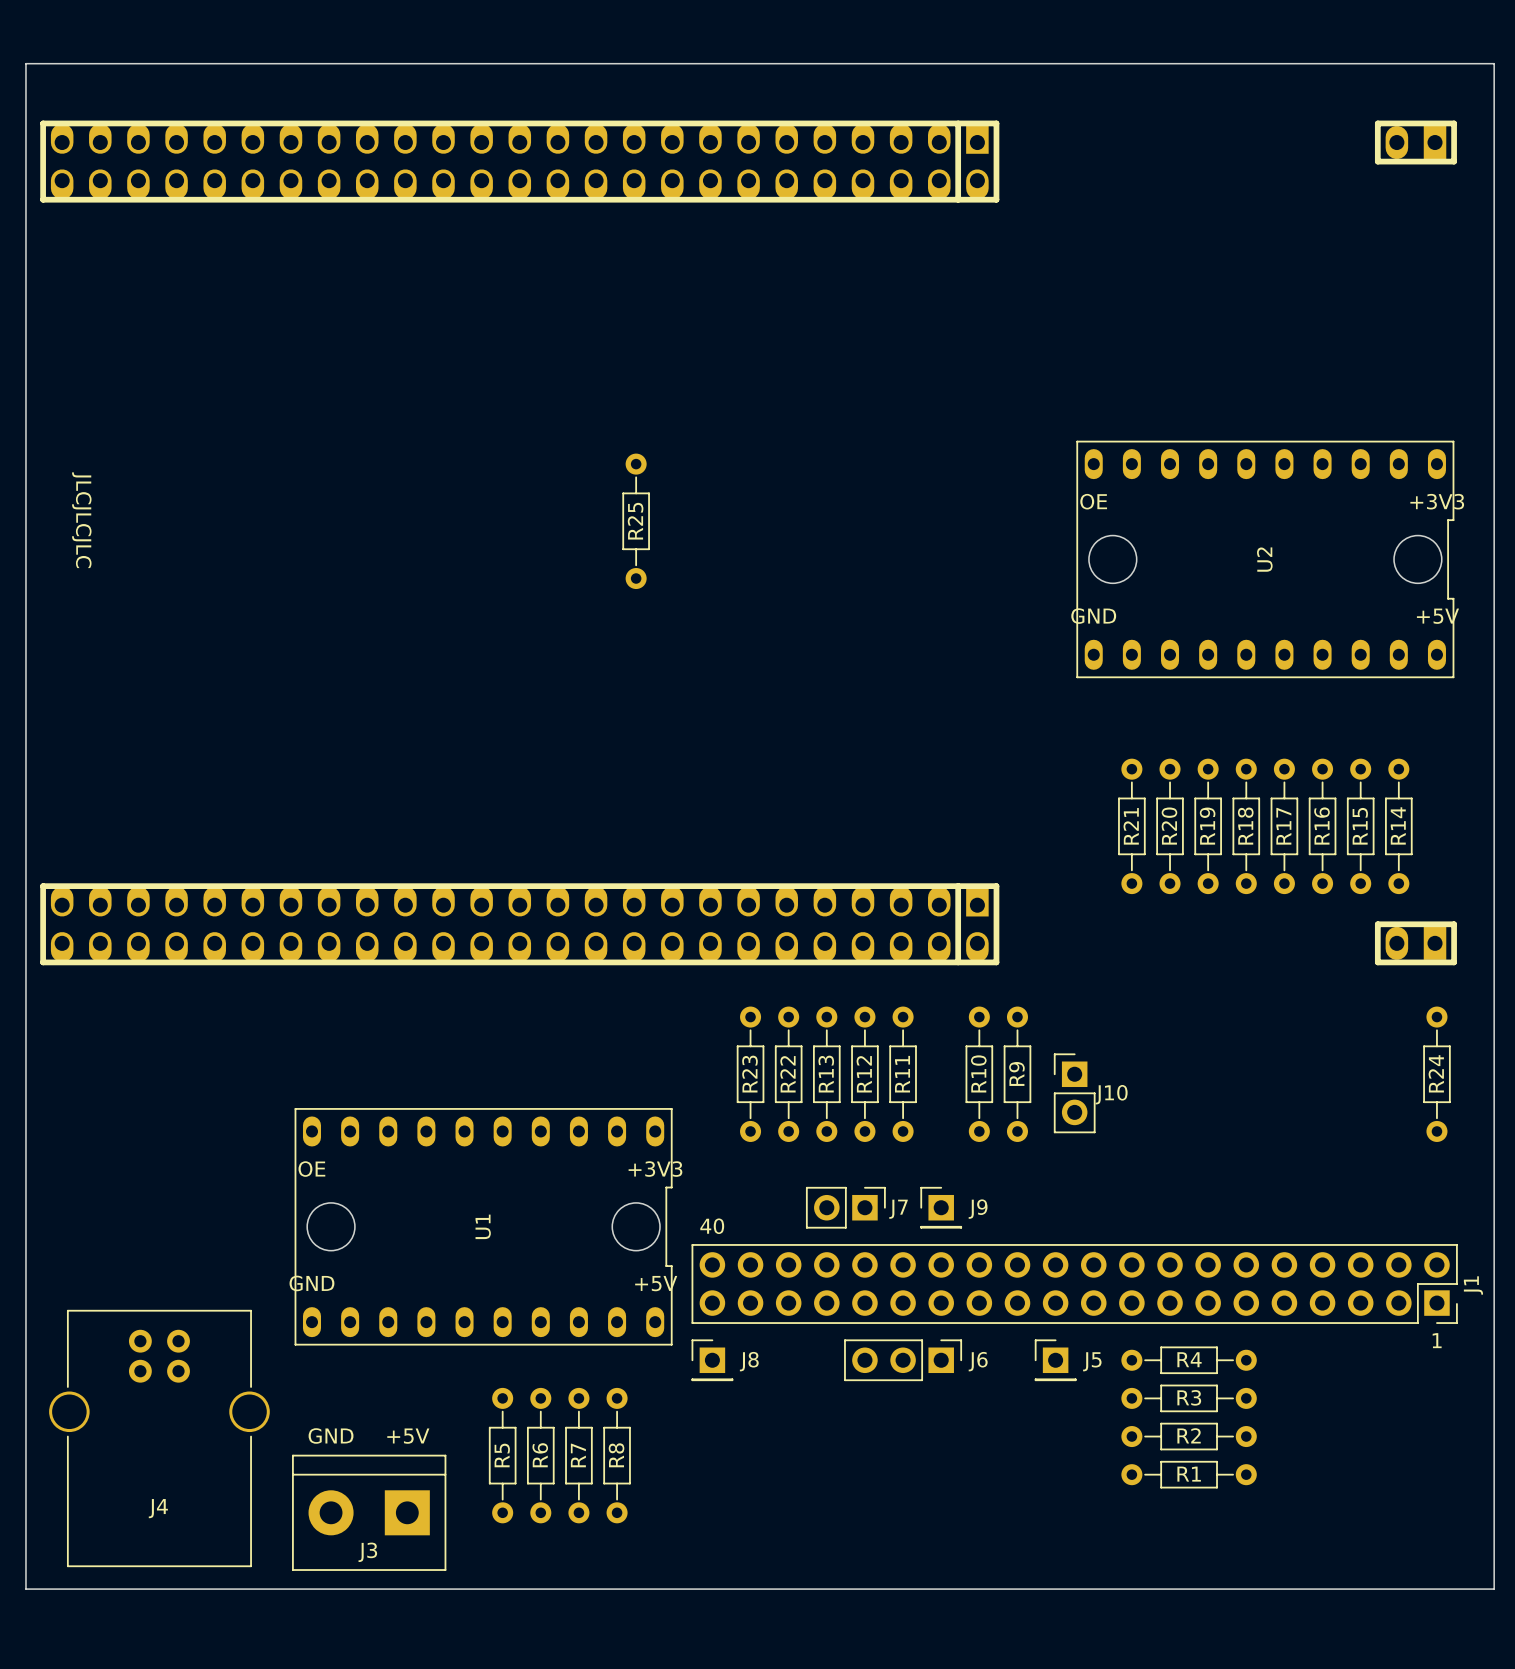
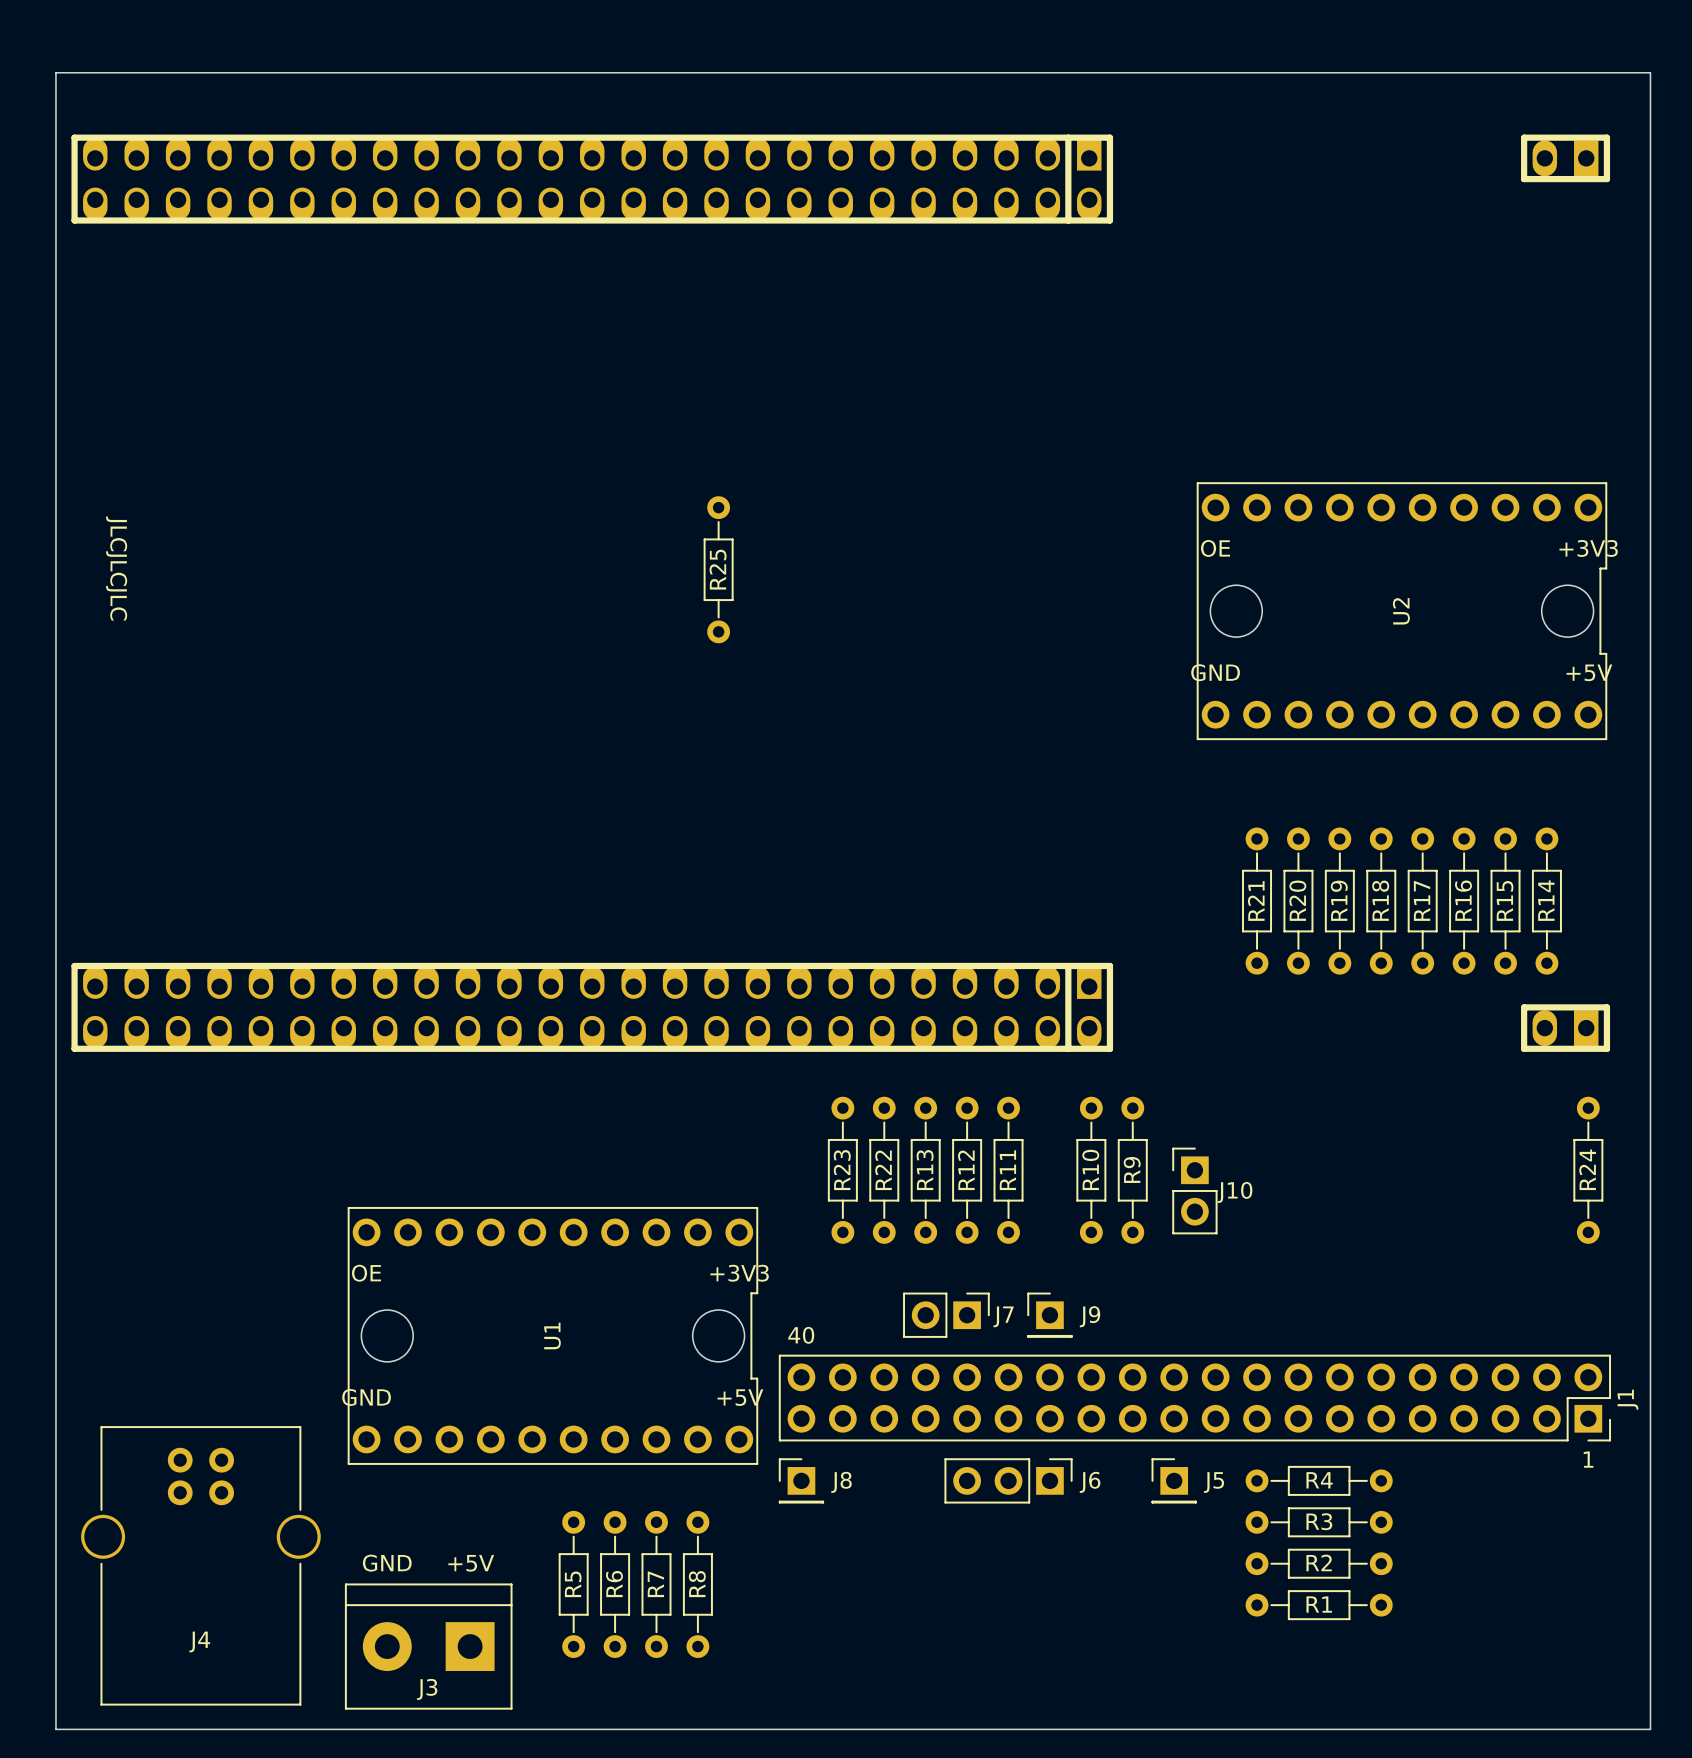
U2 footprint: [1076, 440, 1455, 679] -> [1196, 482, 1608, 741]
U1 footprint: [294, 1108, 673, 1346] -> [347, 1206, 759, 1465]

